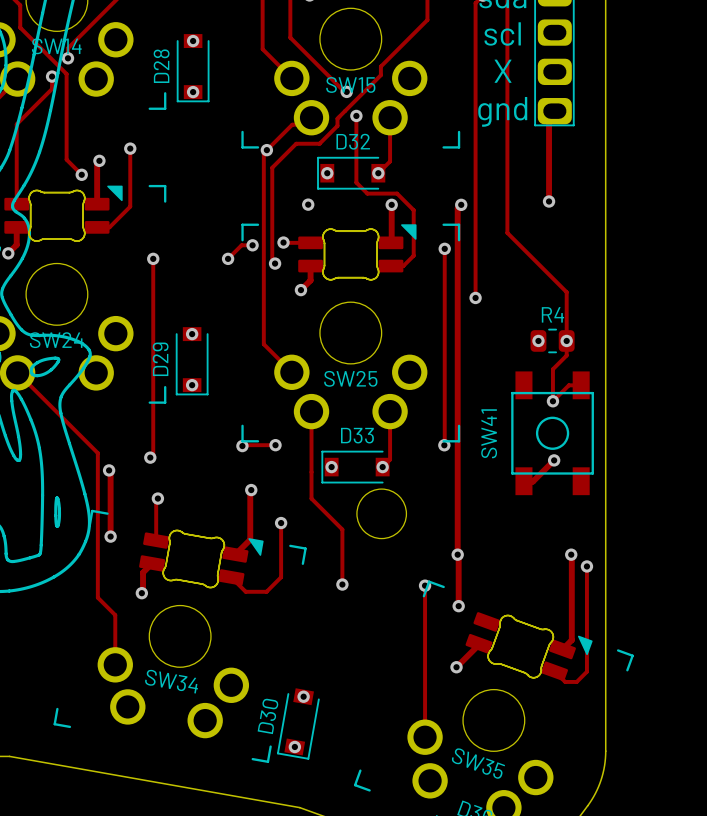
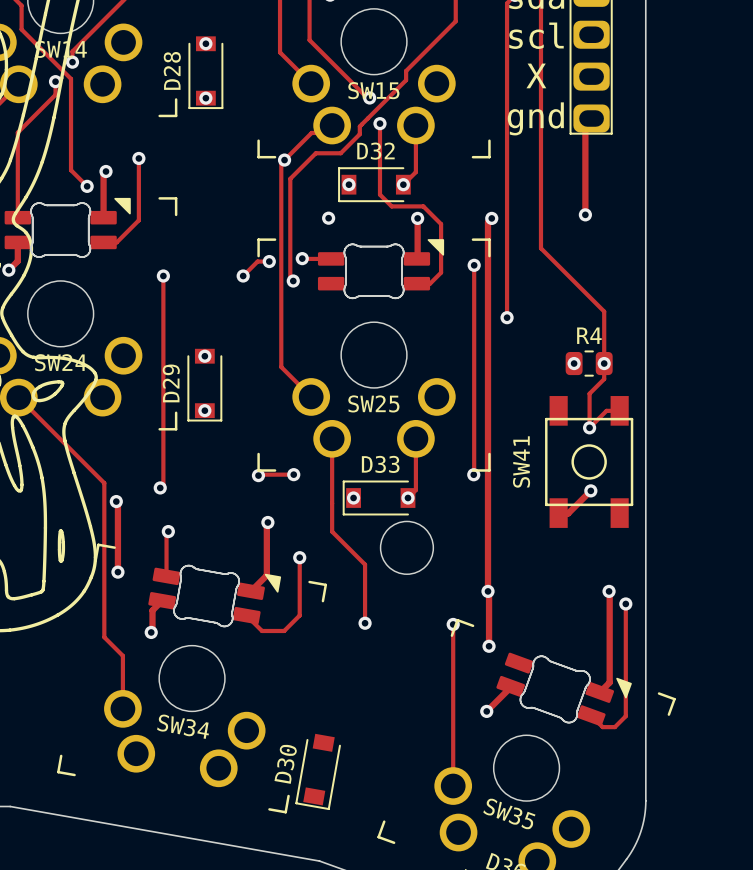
track: (310, 266) (310, 280) (300, 290) -> none
via: (300, 290) -> none
via: (303, 696) -> none
via: (294, 746) -> none

